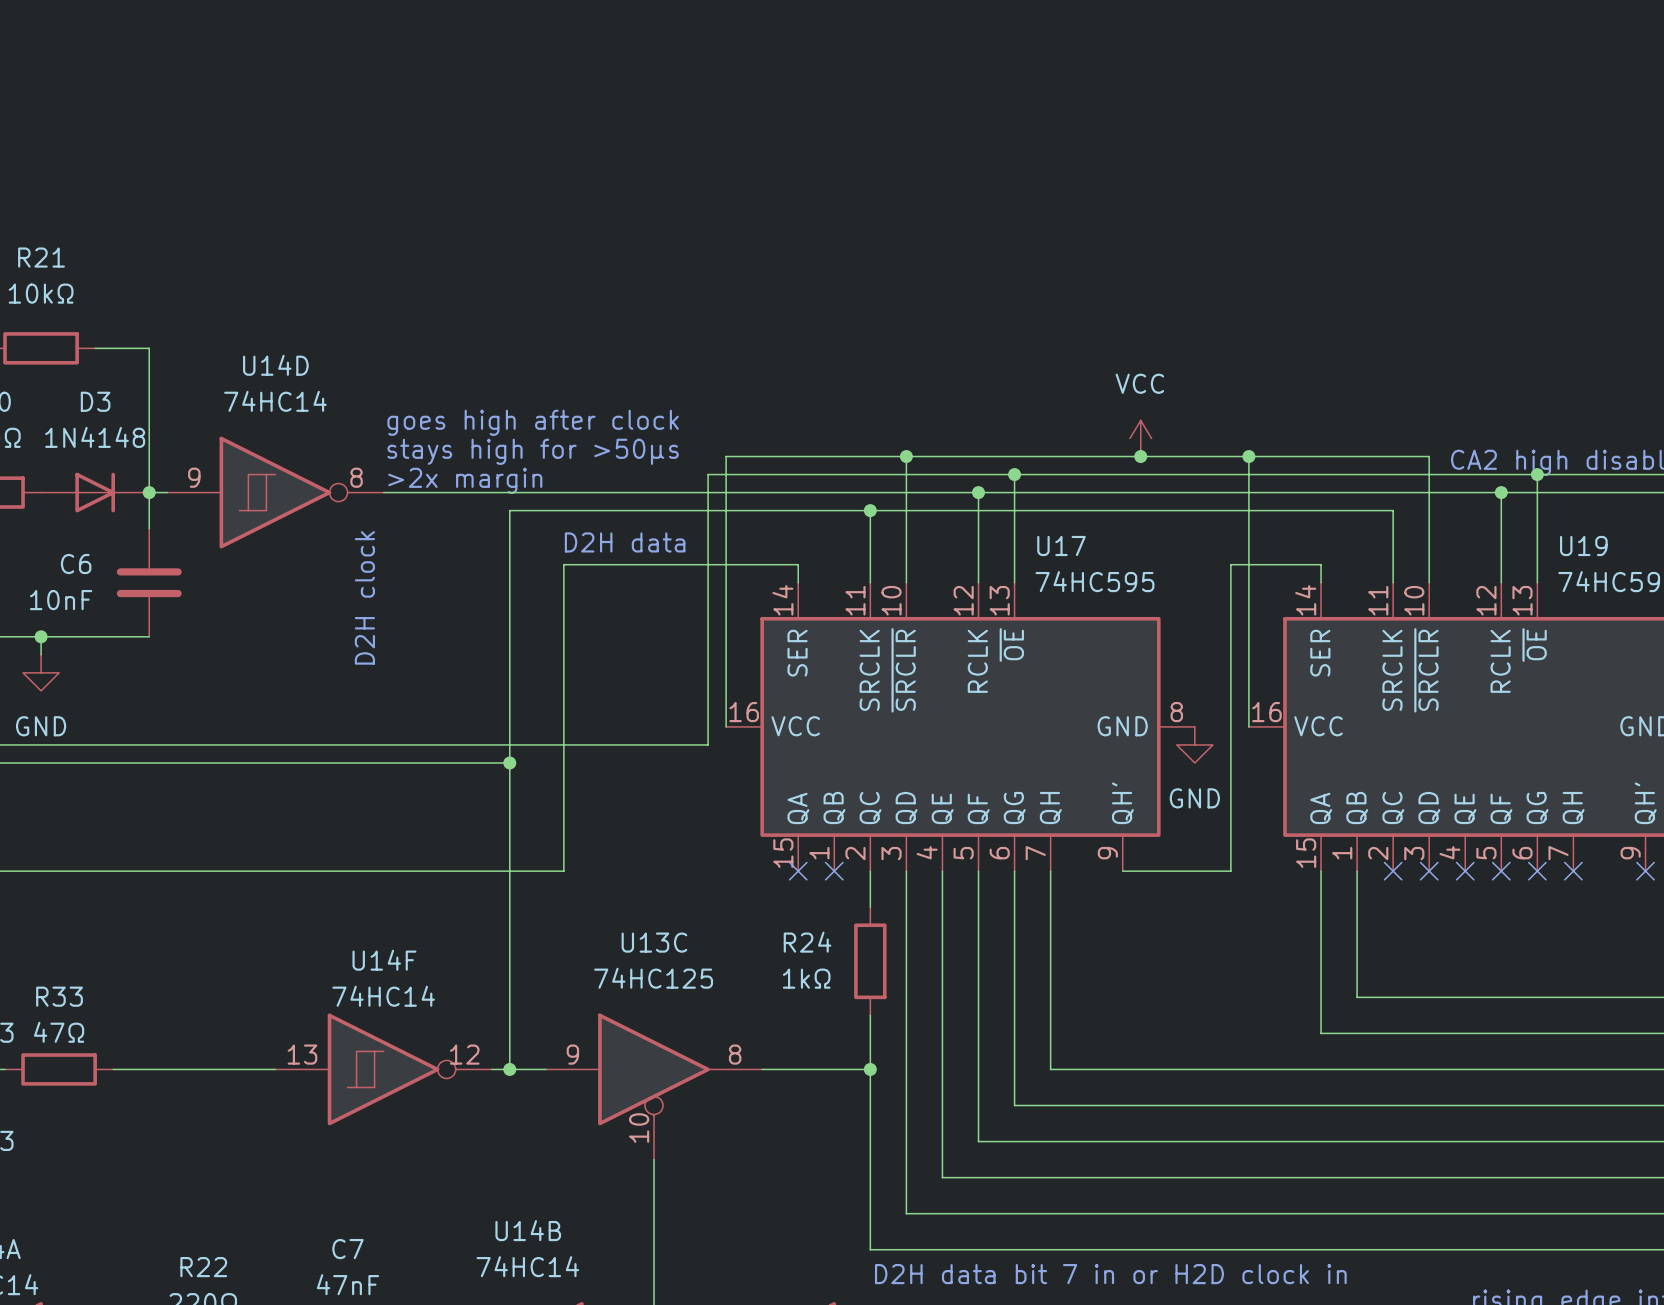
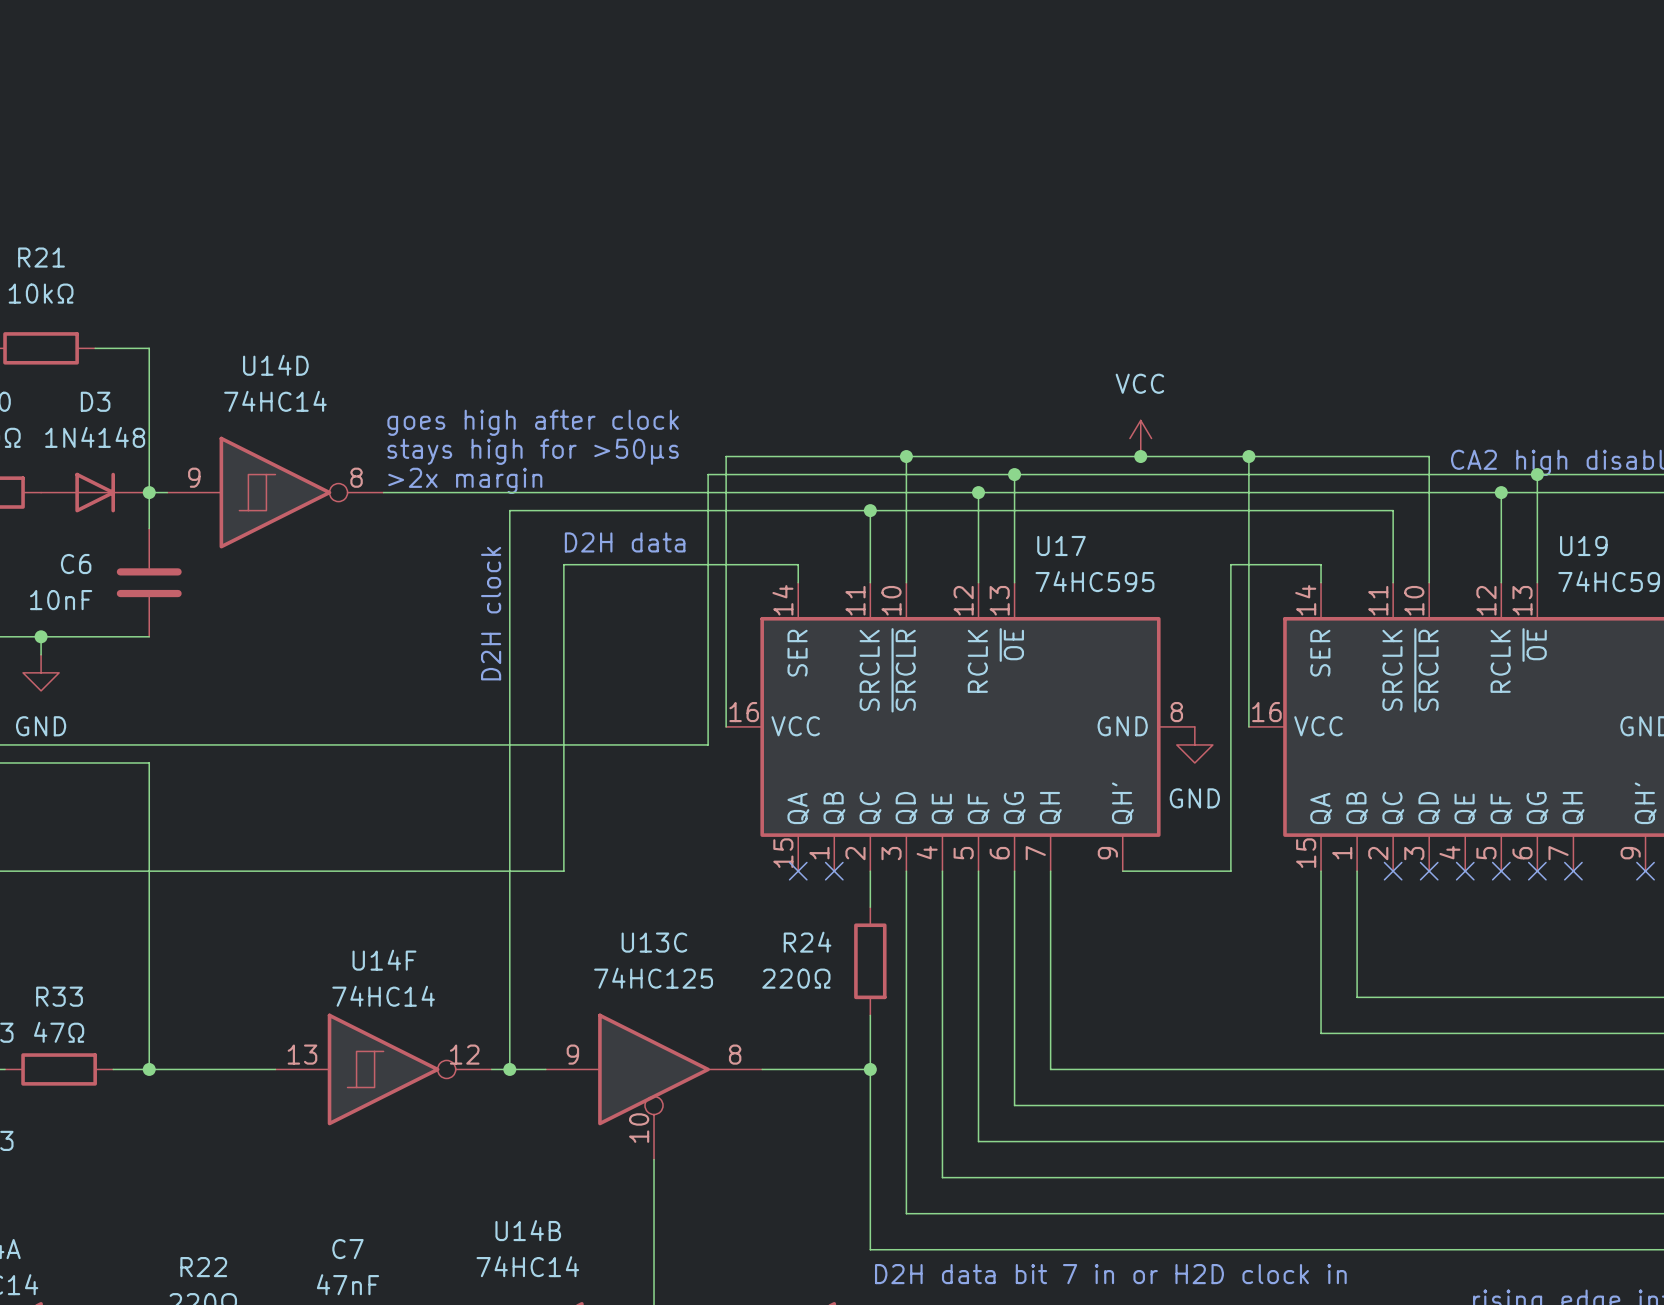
text position: D2H clock (364, 597) -> D2H clock (491, 613)
wire: (149, 762) (509, 762) -> (149, 762) (149, 1069)
junction: (509, 762) -> none
R24 value: 1kΩ (806, 978) -> 220Ω (796, 978)
junction: none -> (149, 1069)

